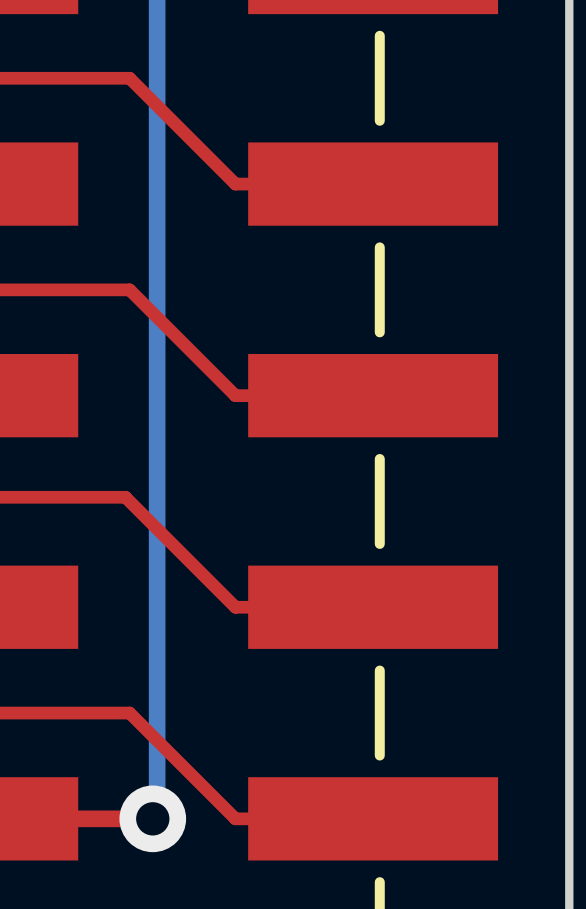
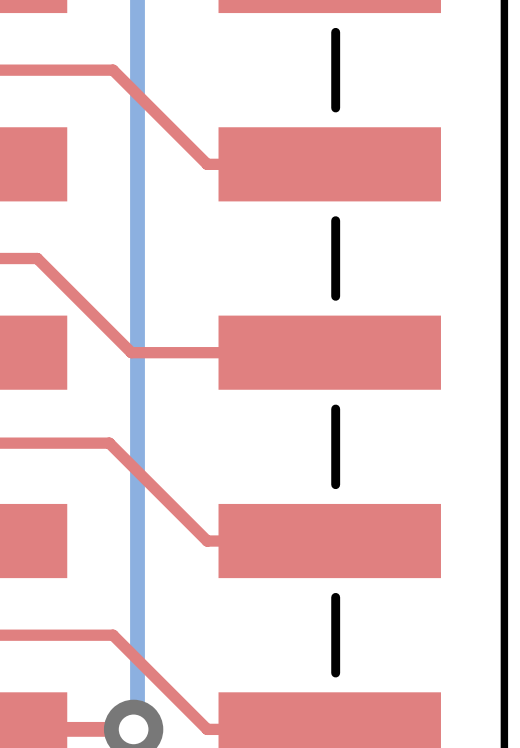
top track: (44, 289) (129, 289) (235, 395) -> (37, 258) (131, 352) (207, 352)

